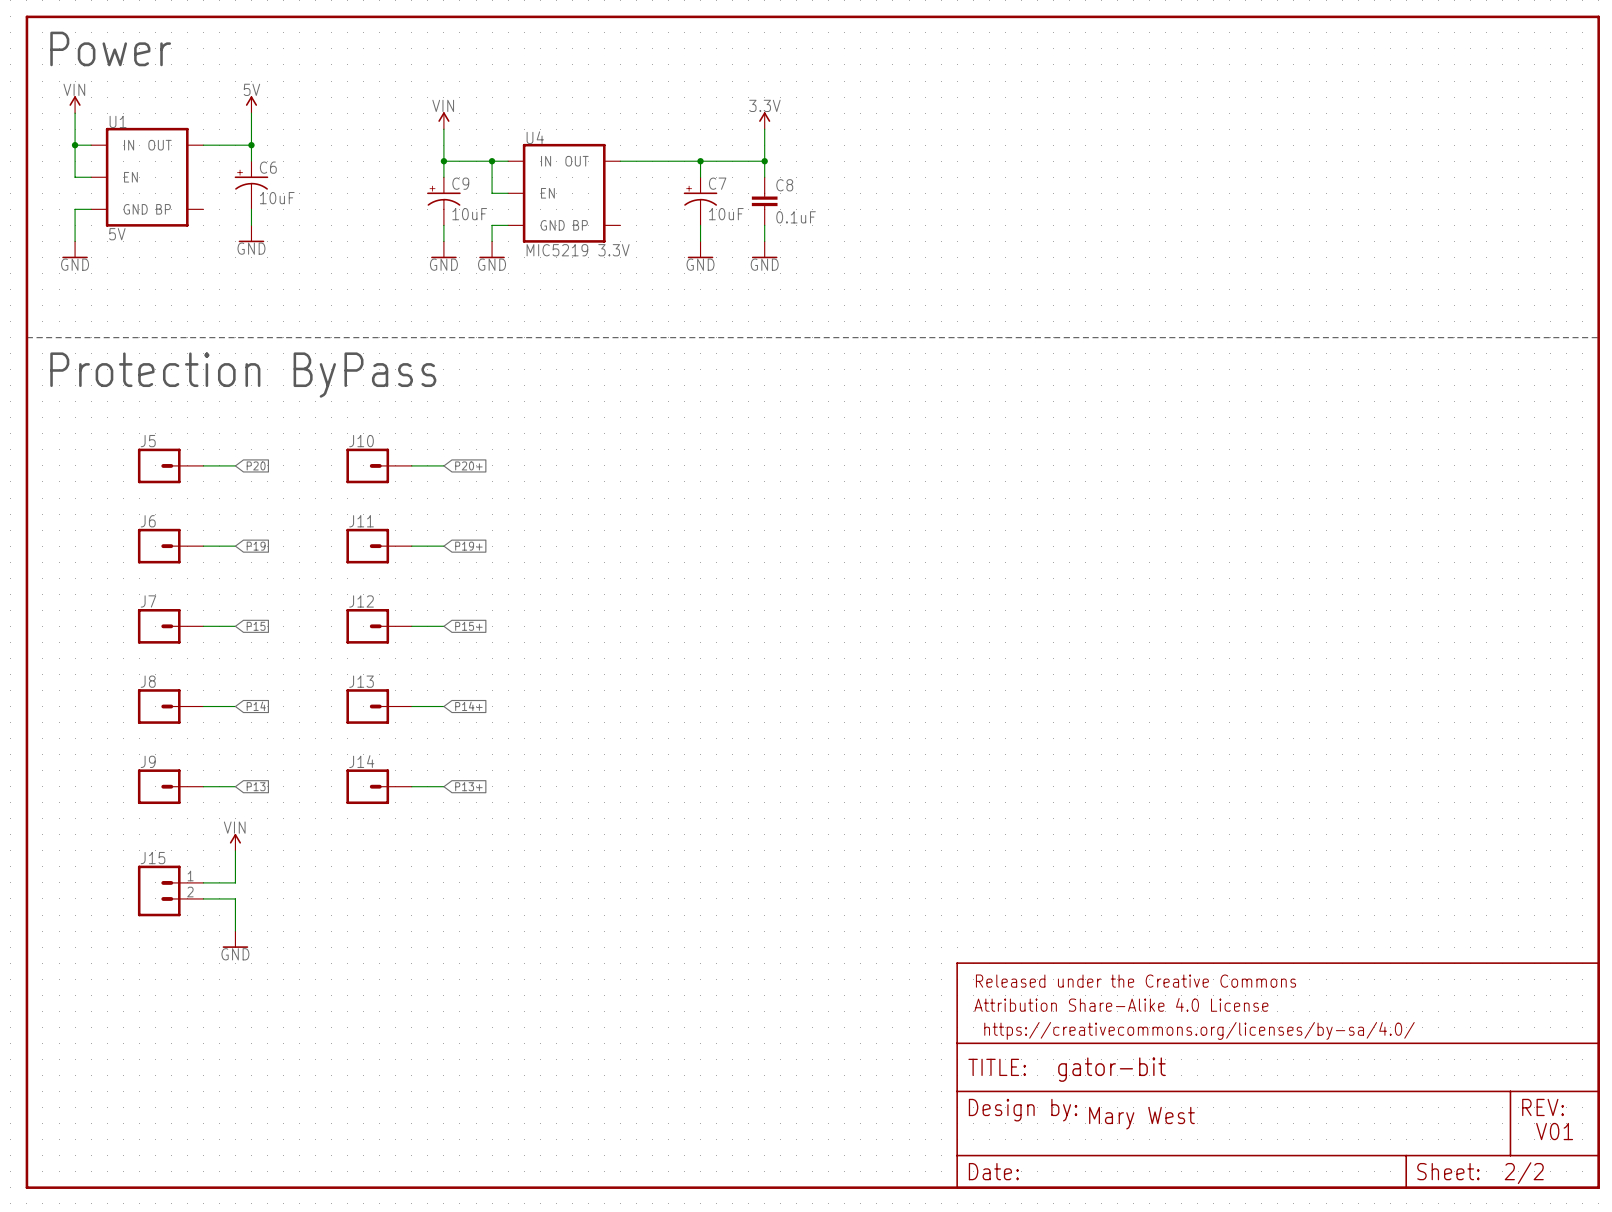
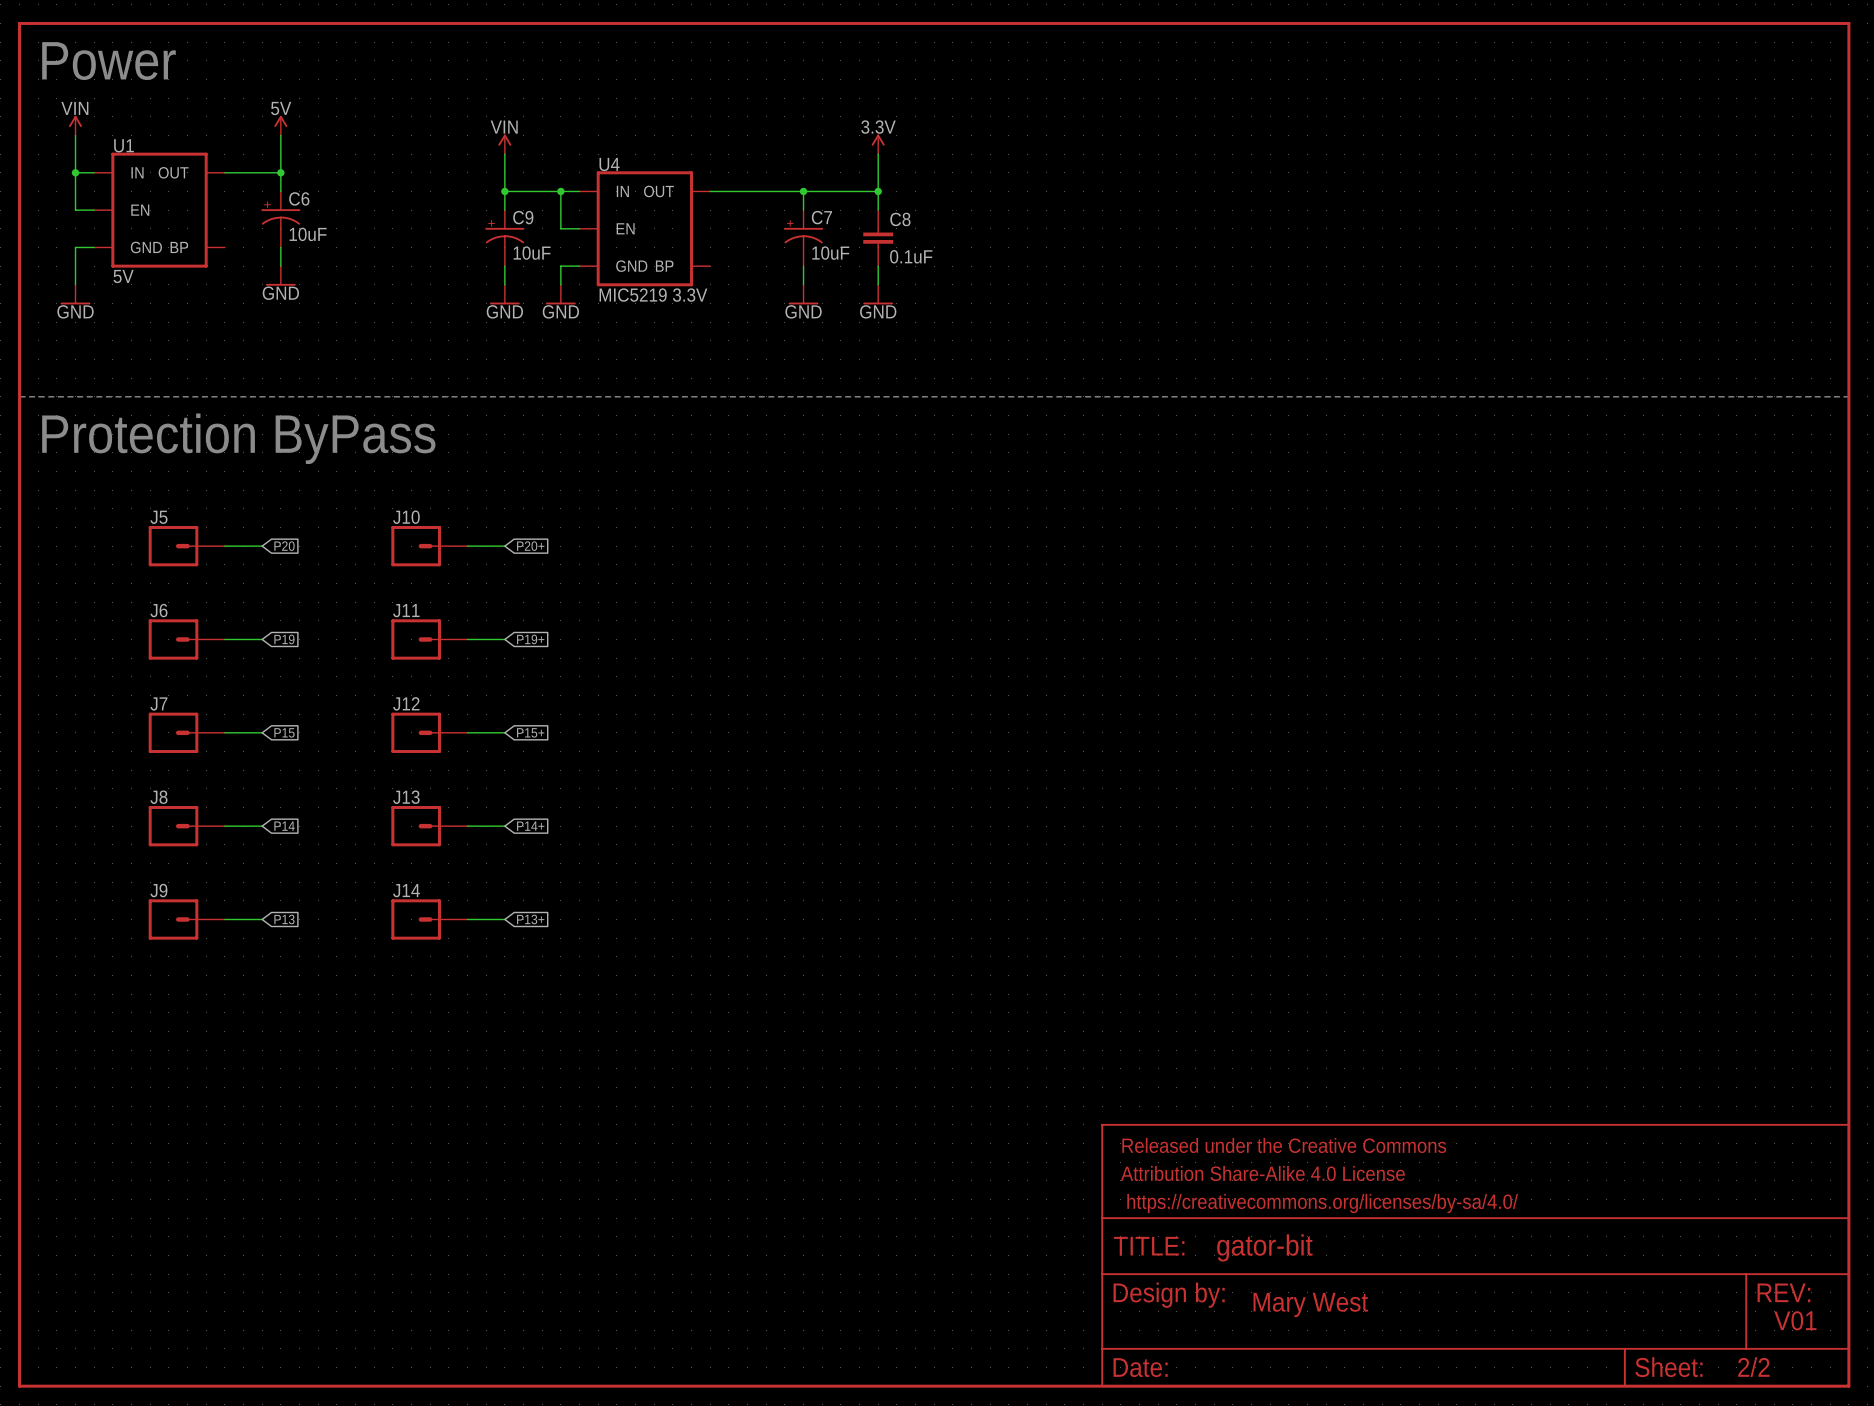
power symbol: VIN (235, 842) -> none
wire: (235, 850) (235, 882) (203, 882) -> none
J15: (170, 890) -> none
wire: (203, 898) (235, 898) (235, 931) -> none
power symbol: GND (235, 939) -> none

